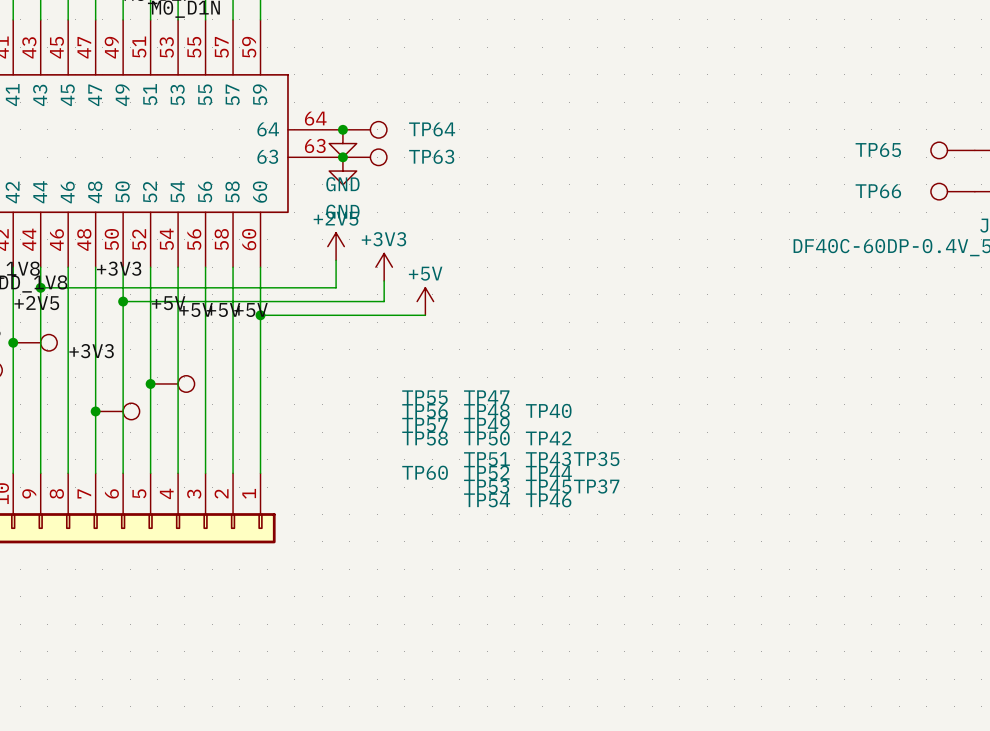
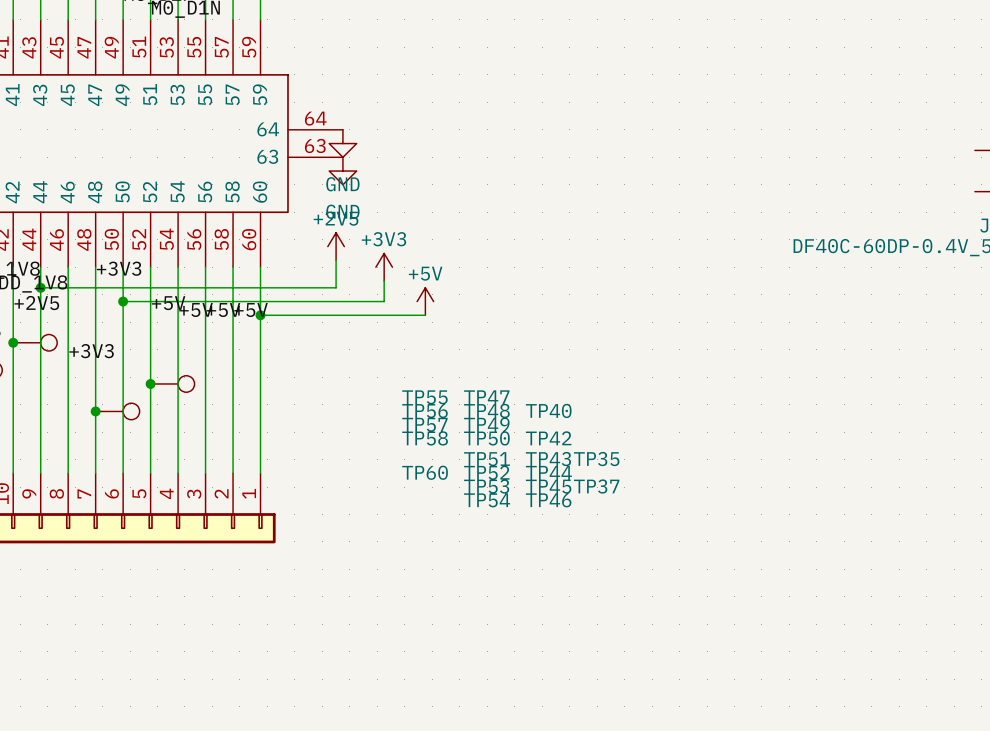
junction: (342, 129) -> none
TP64: (364, 129) -> none
TP65: (952, 150) -> none
junction: (342, 157) -> none
TP63: (364, 157) -> none
TP66: (952, 191) -> none

